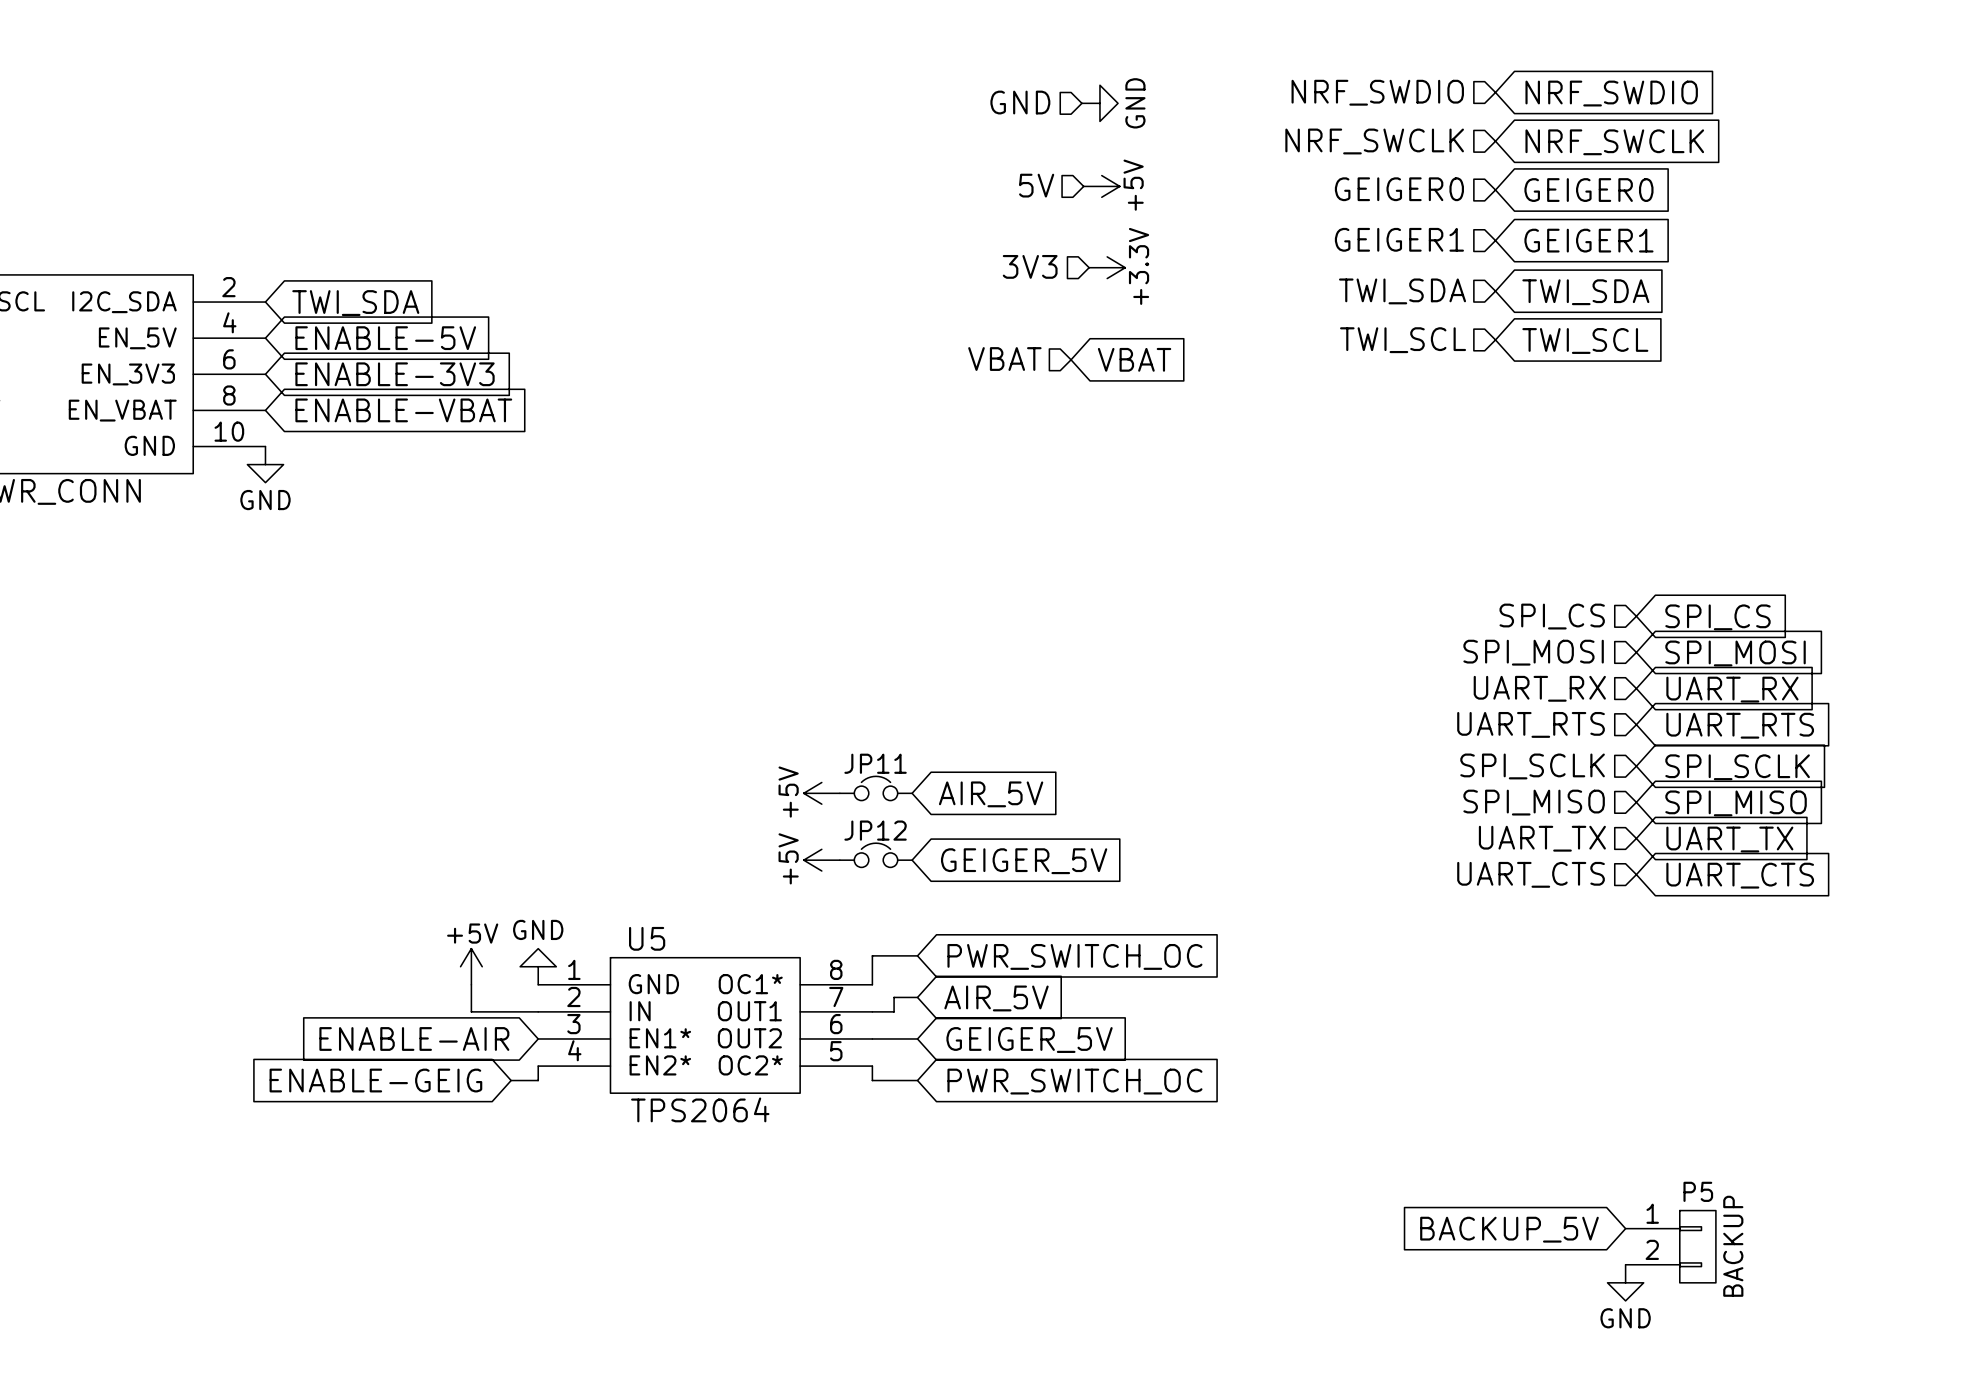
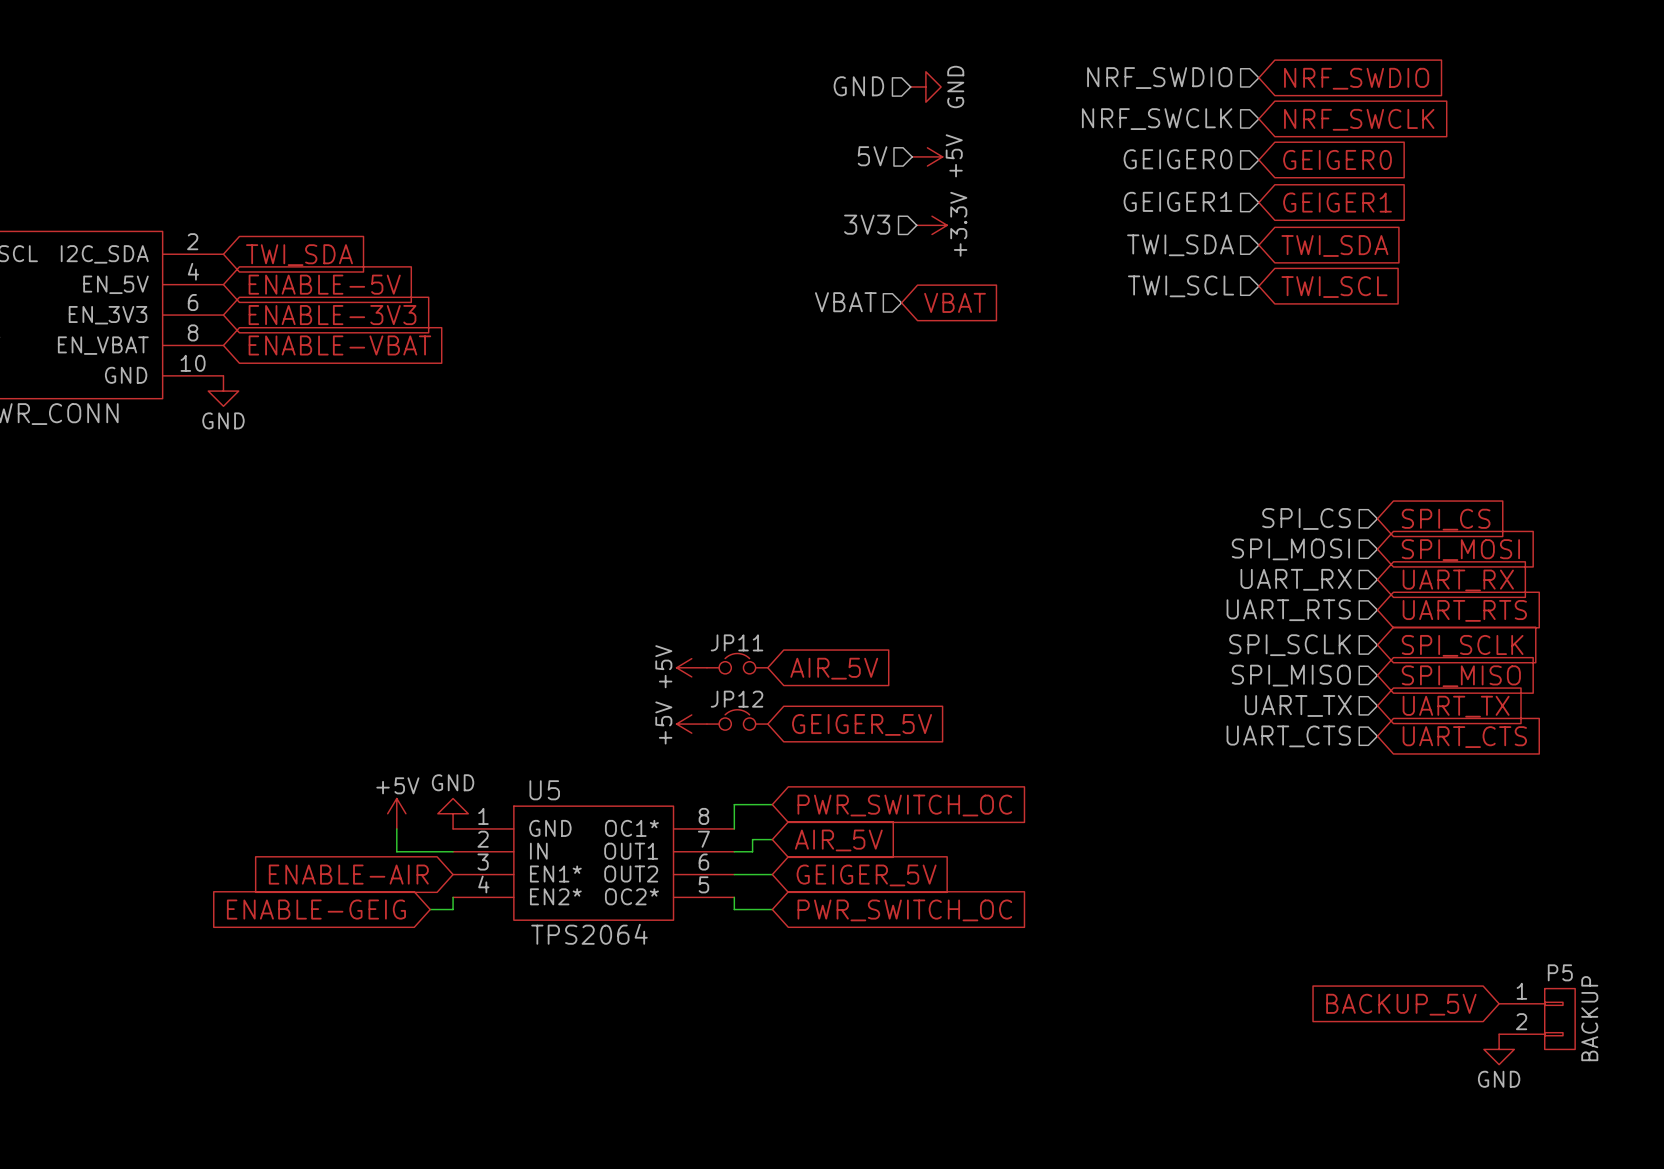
global label position: BACKUP_5V (1509, 1229) -> BACKUP_5V (1401, 1004)
P5 position: (1670, 1246) -> (1537, 1019)
power symbol position: GND (1625, 1282) -> GND (1499, 1049)

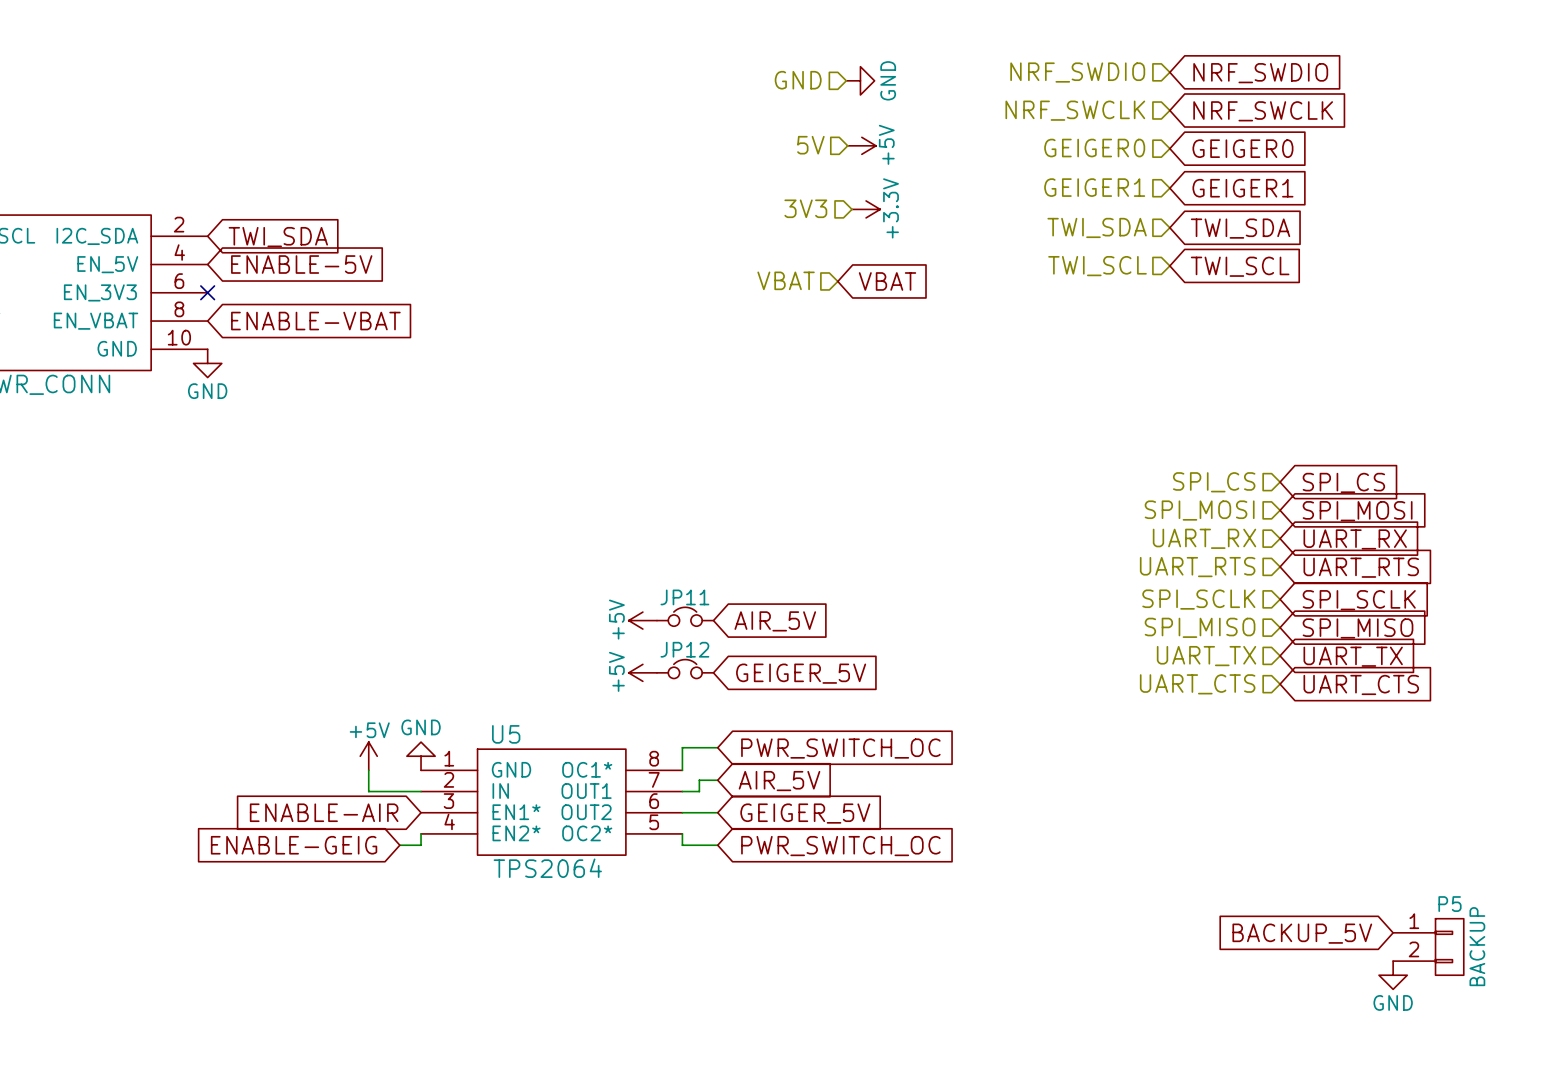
no-connect mark: none -> (207, 292)
global label: ENABLE-3V3 (332, 315) -> none

